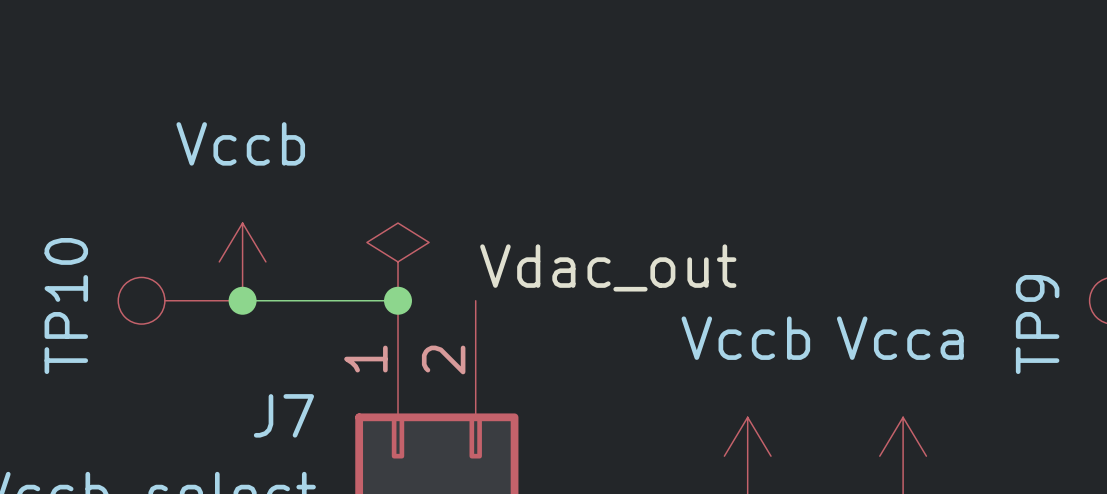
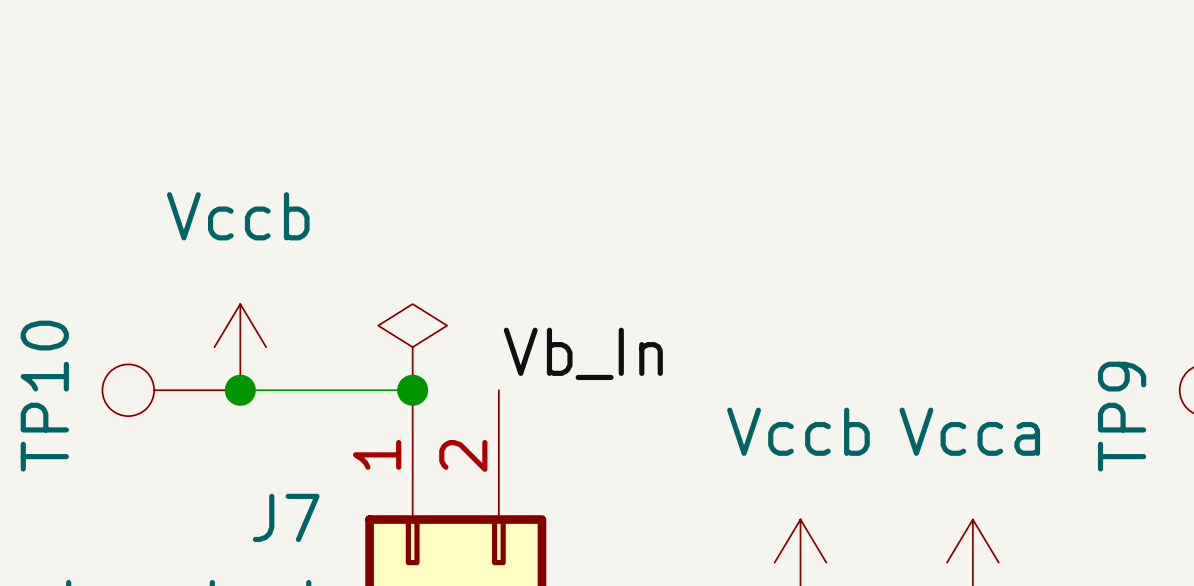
label: Vdac_out (608, 267) -> Vb_In (583, 353)

